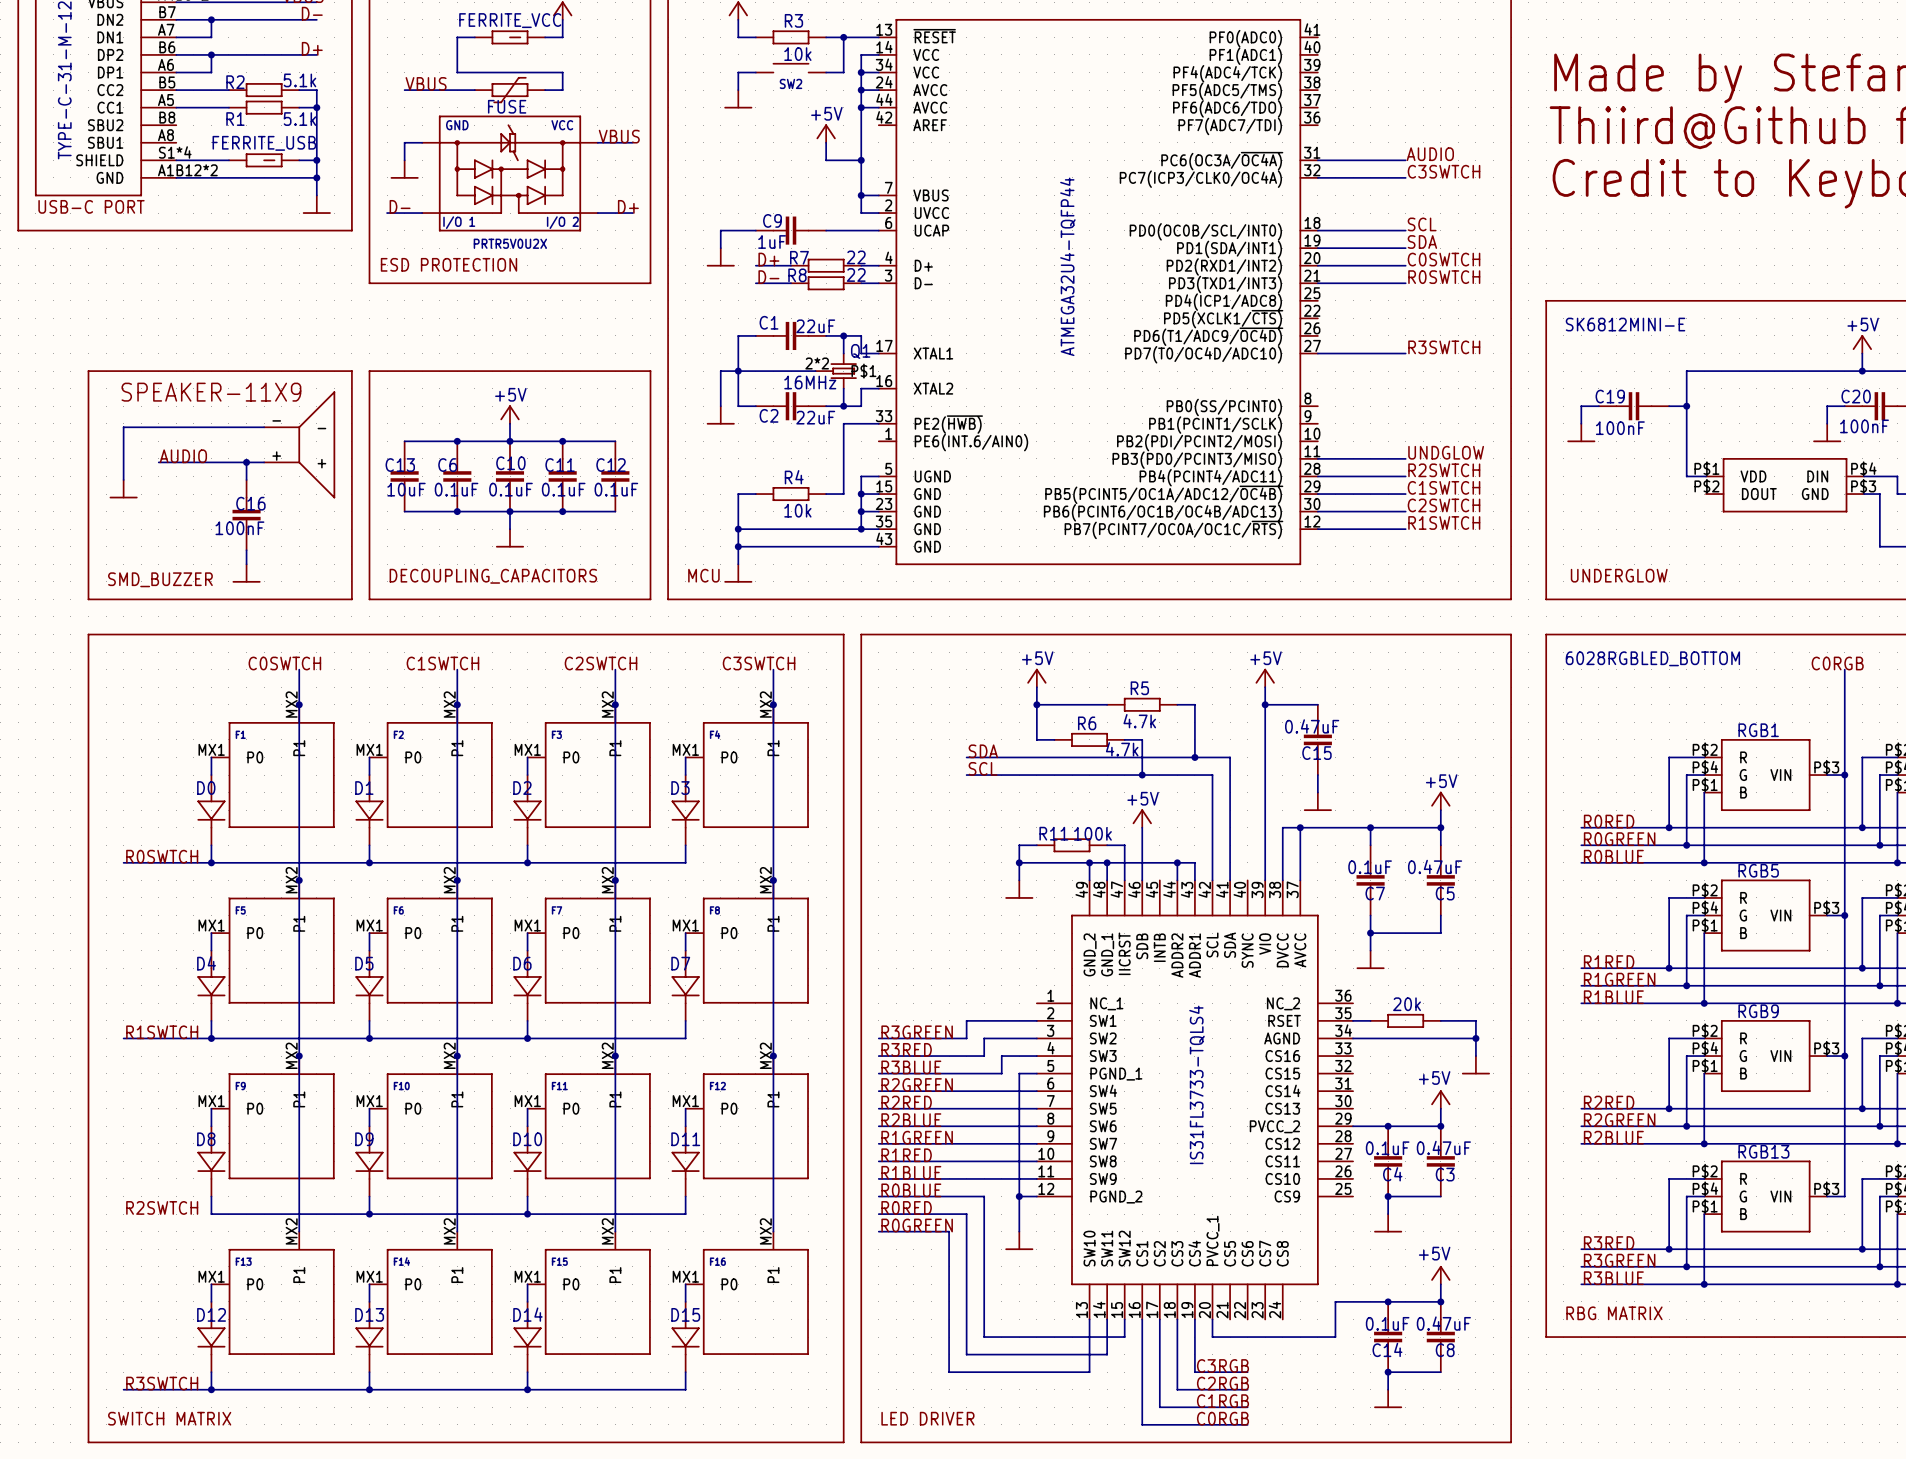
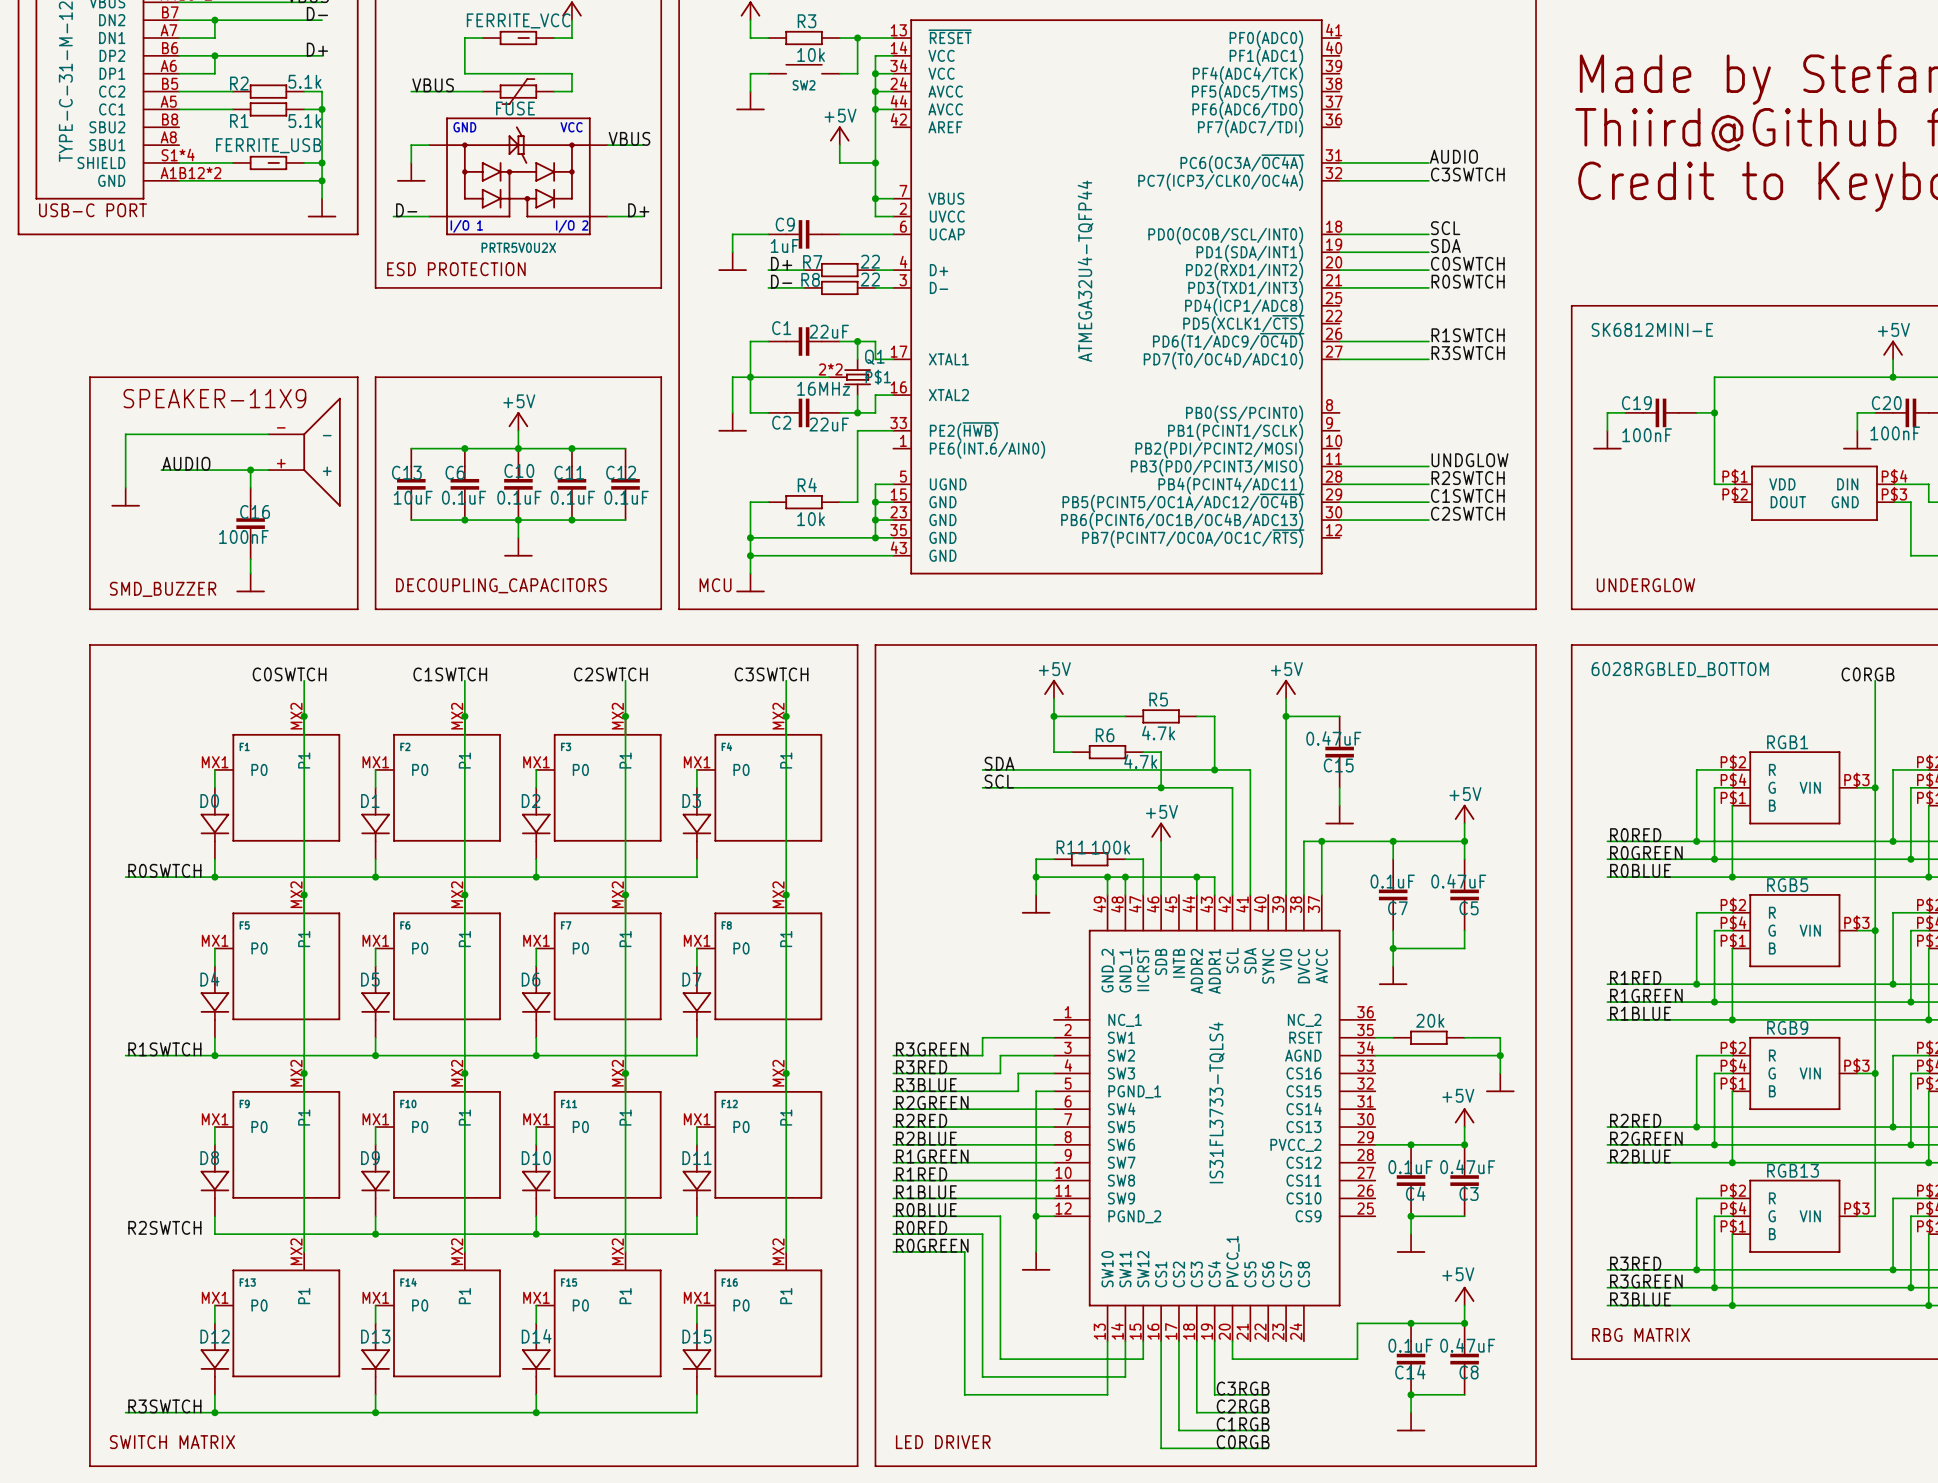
label: none -> R1SWTCH (1468, 335)
wire: none -> (1339, 341) (1428, 341)
label: R1SWTCH (1444, 523) -> none
wire: (1317, 529) (1405, 529) -> none

